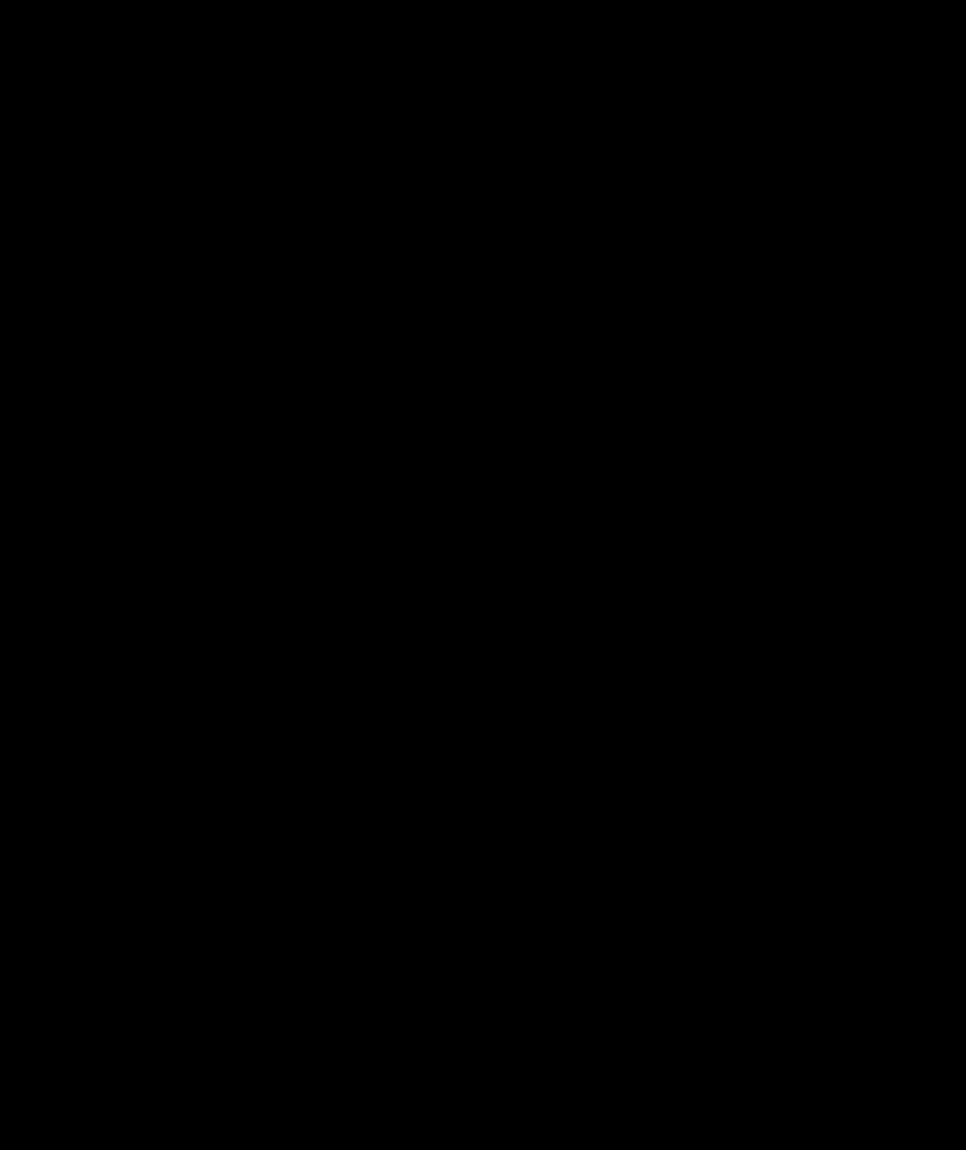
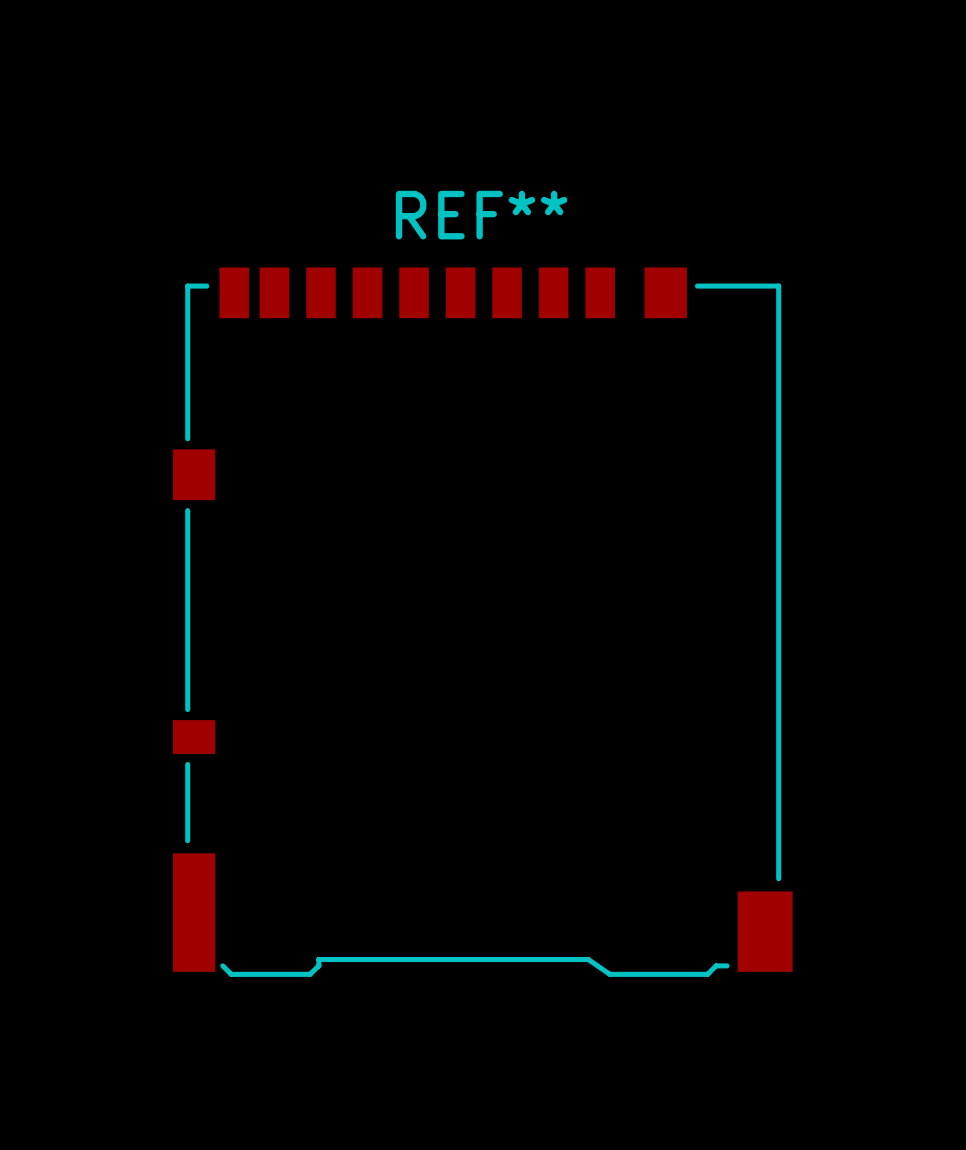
REF**: none -> (482, 622)

